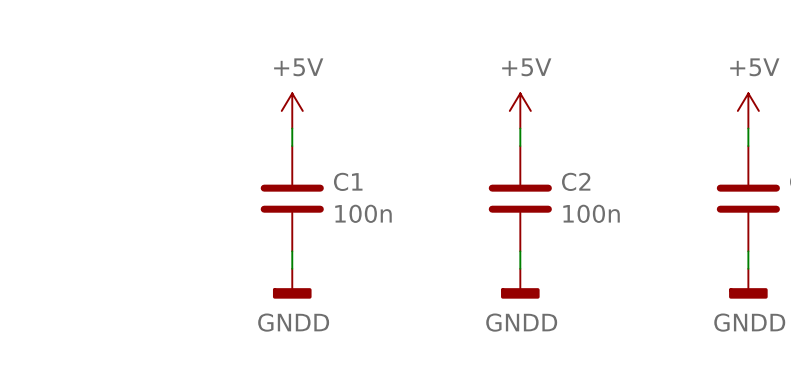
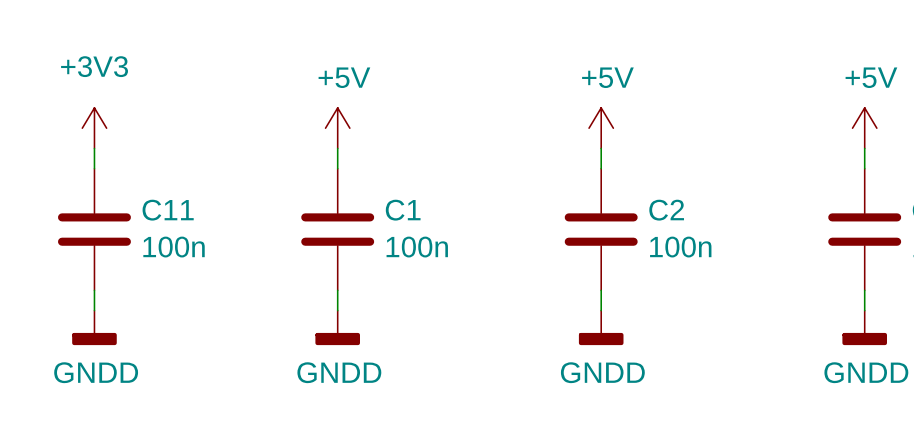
power symbol: none -> +3V3 (94, 128)
wire: none -> (94, 148) (94, 168)
C11: none -> 100n (94, 229)
wire: none -> (94, 290) (94, 310)
power symbol: none -> GNDD (94, 327)

